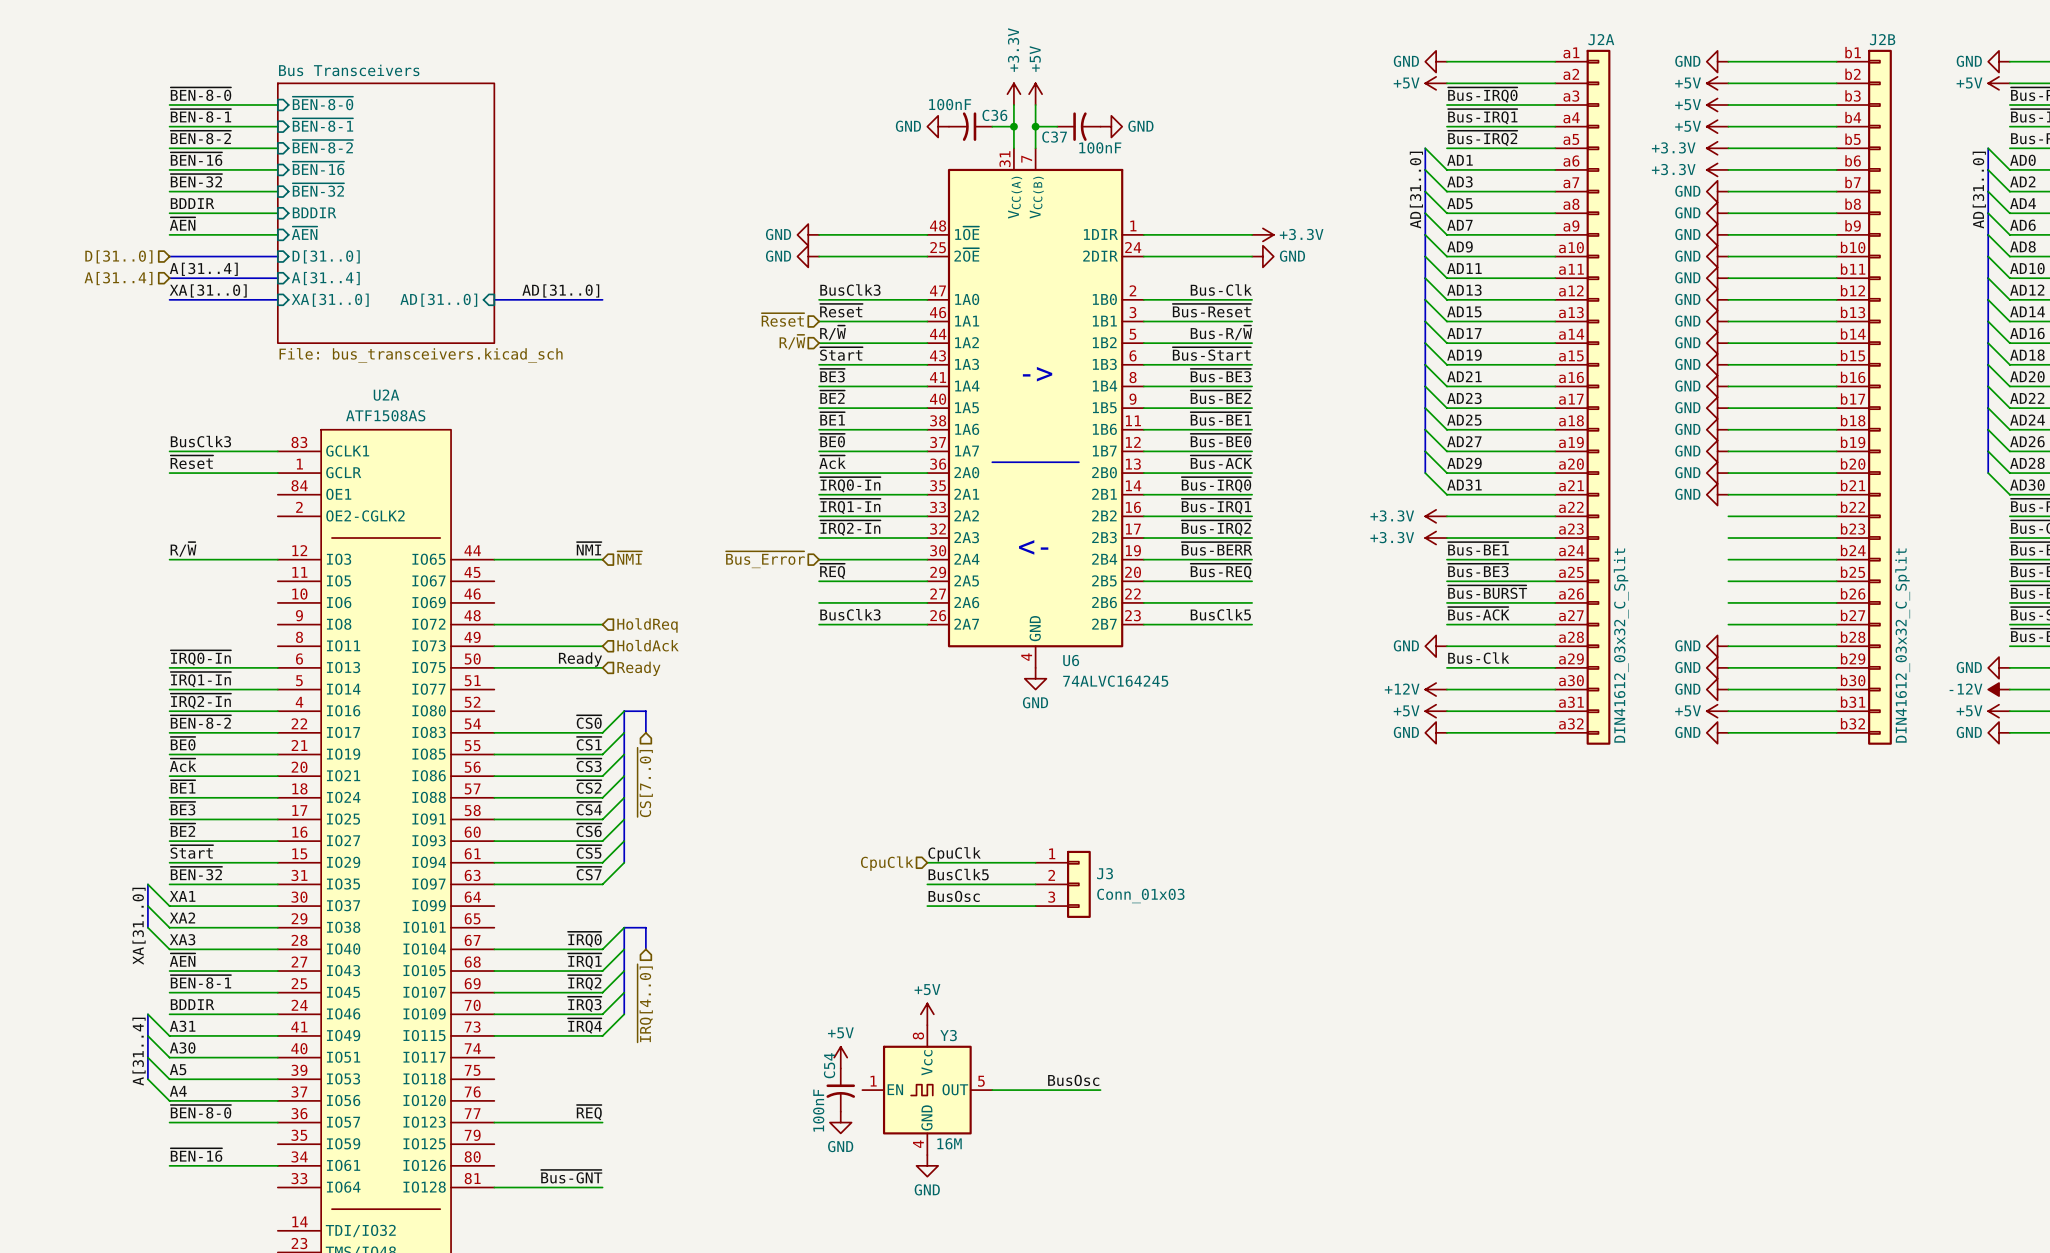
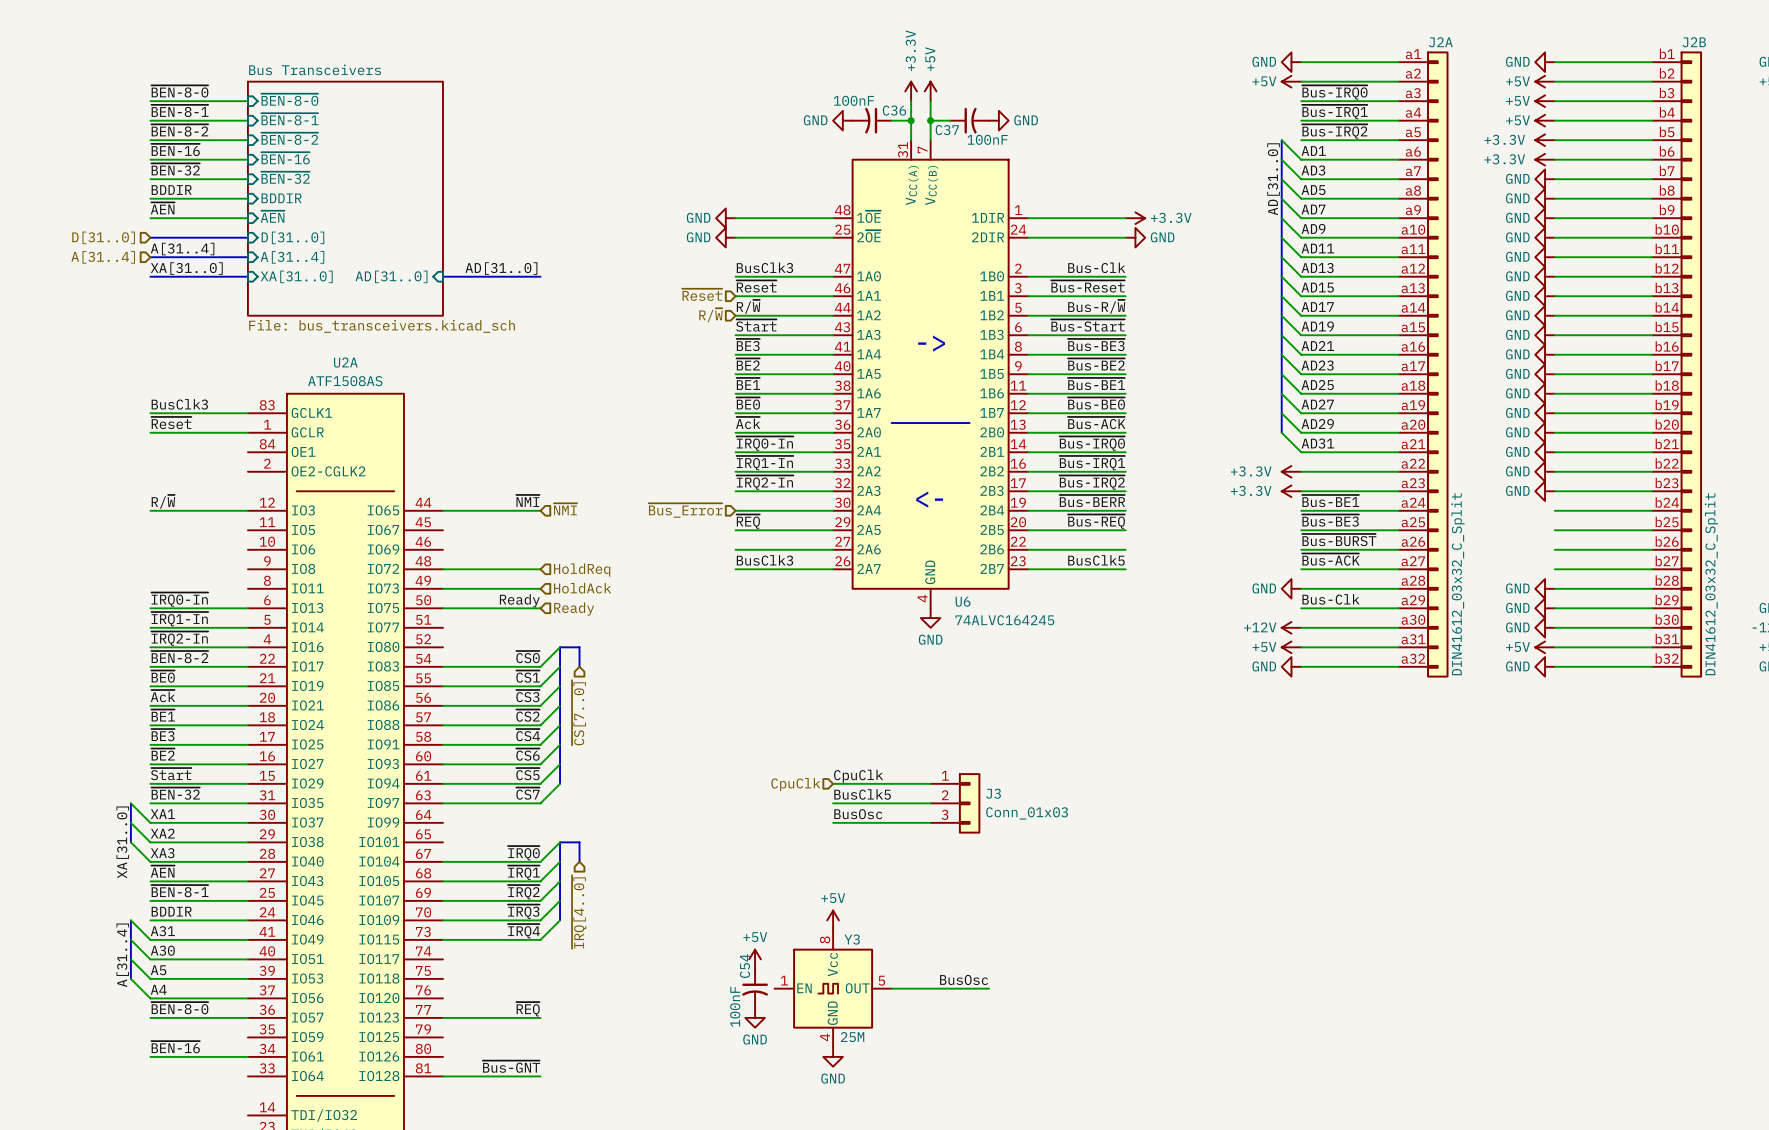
power symbol: none -> GND (1545, 471)
power symbol: none -> GND (1545, 491)
Y3 value: 16M (949, 1143) -> 25M (852, 1037)

